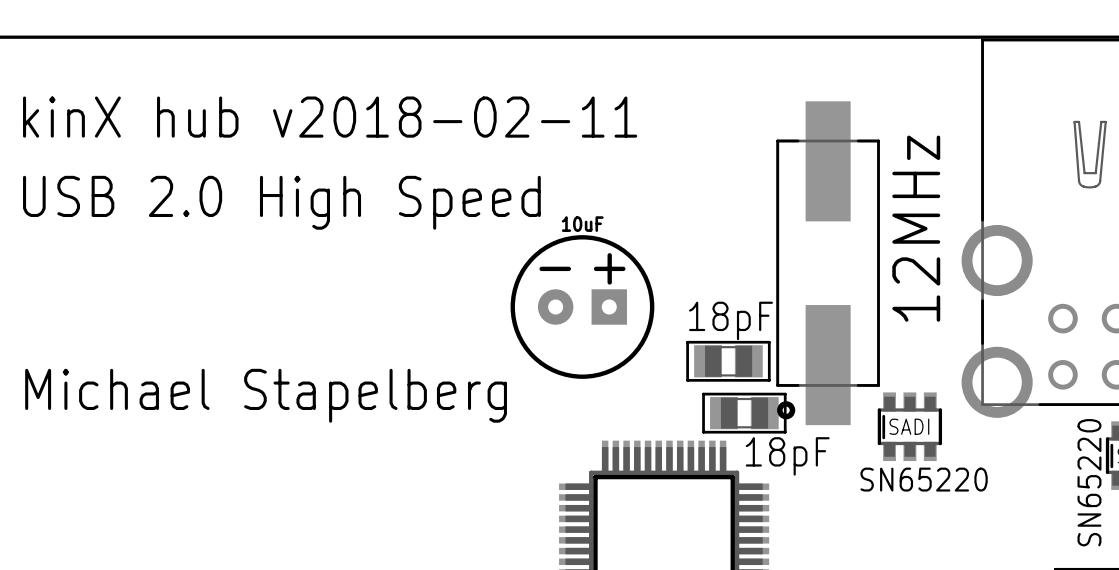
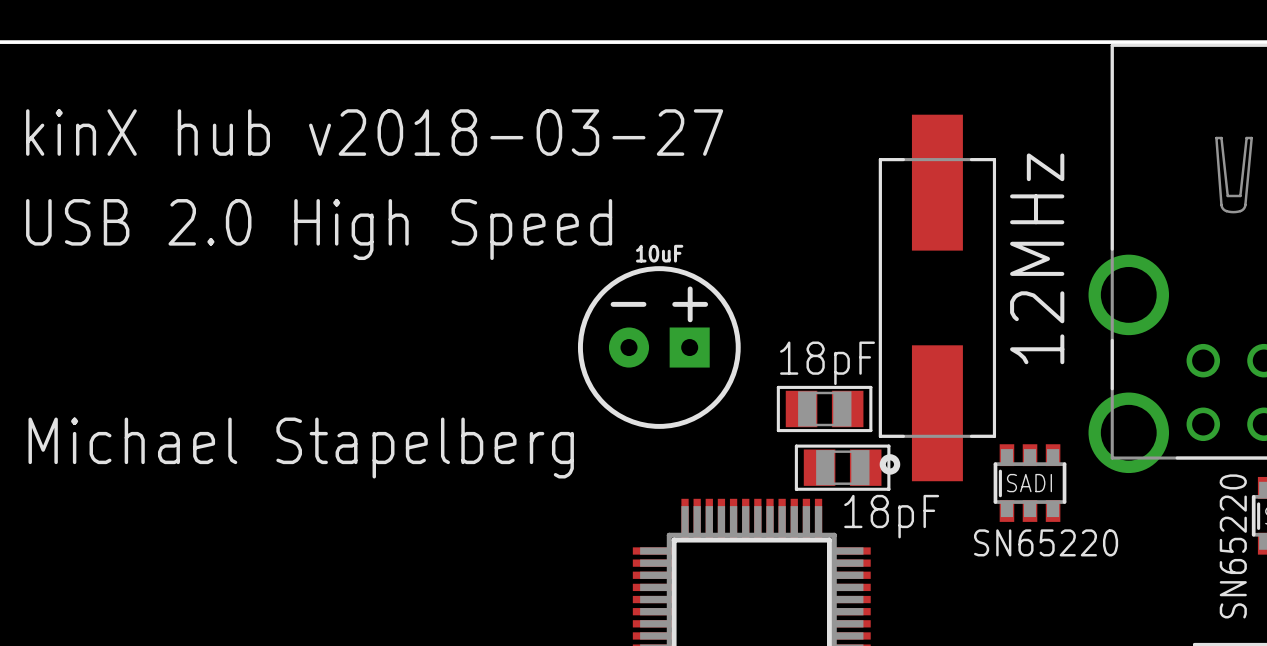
text: kinX hub v2018-02-11 (330, 117) -> kinX hub v2018-03-27 (374, 132)

